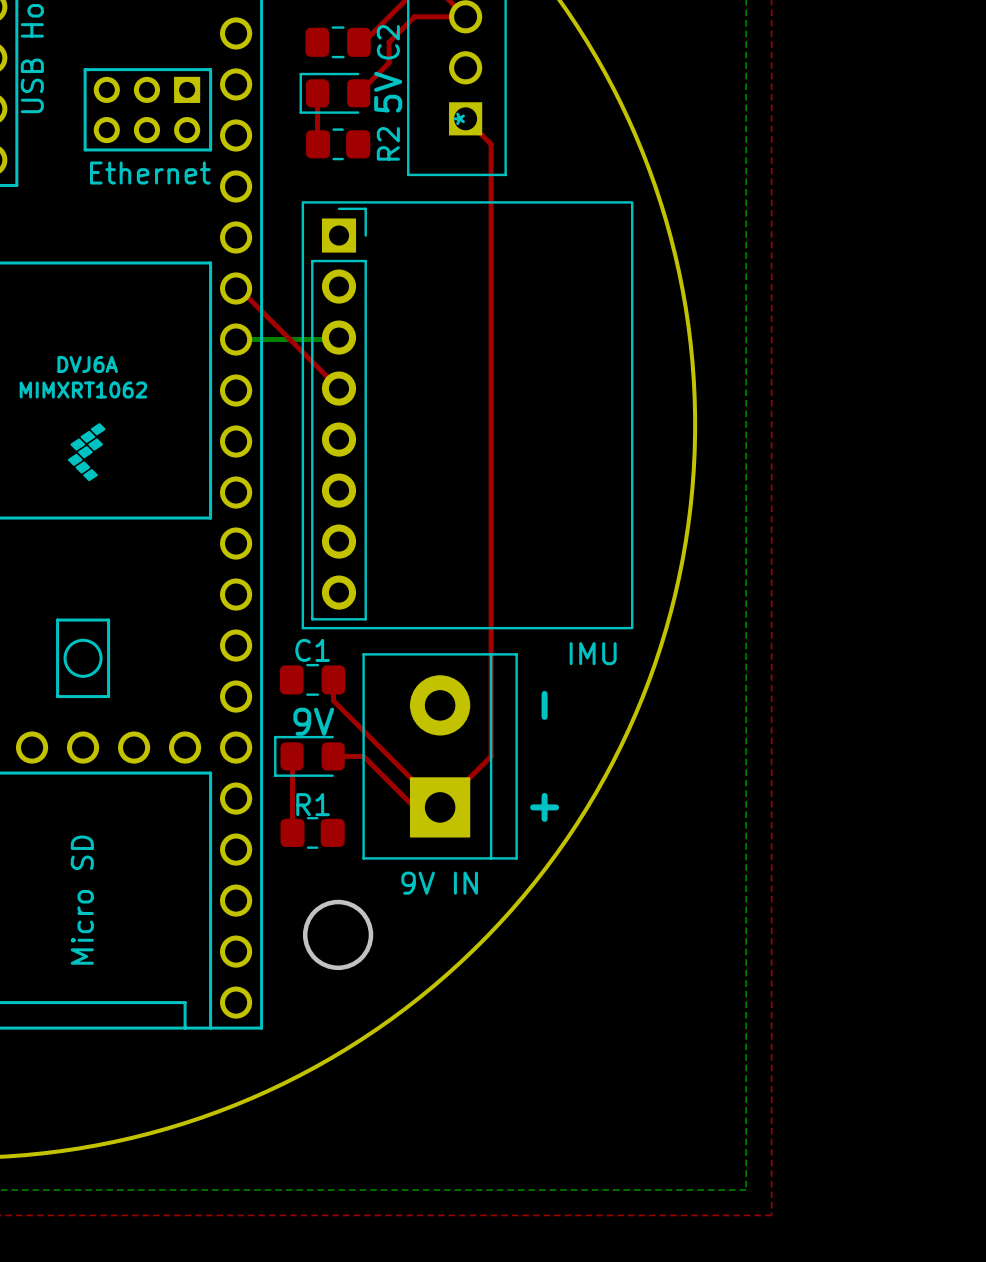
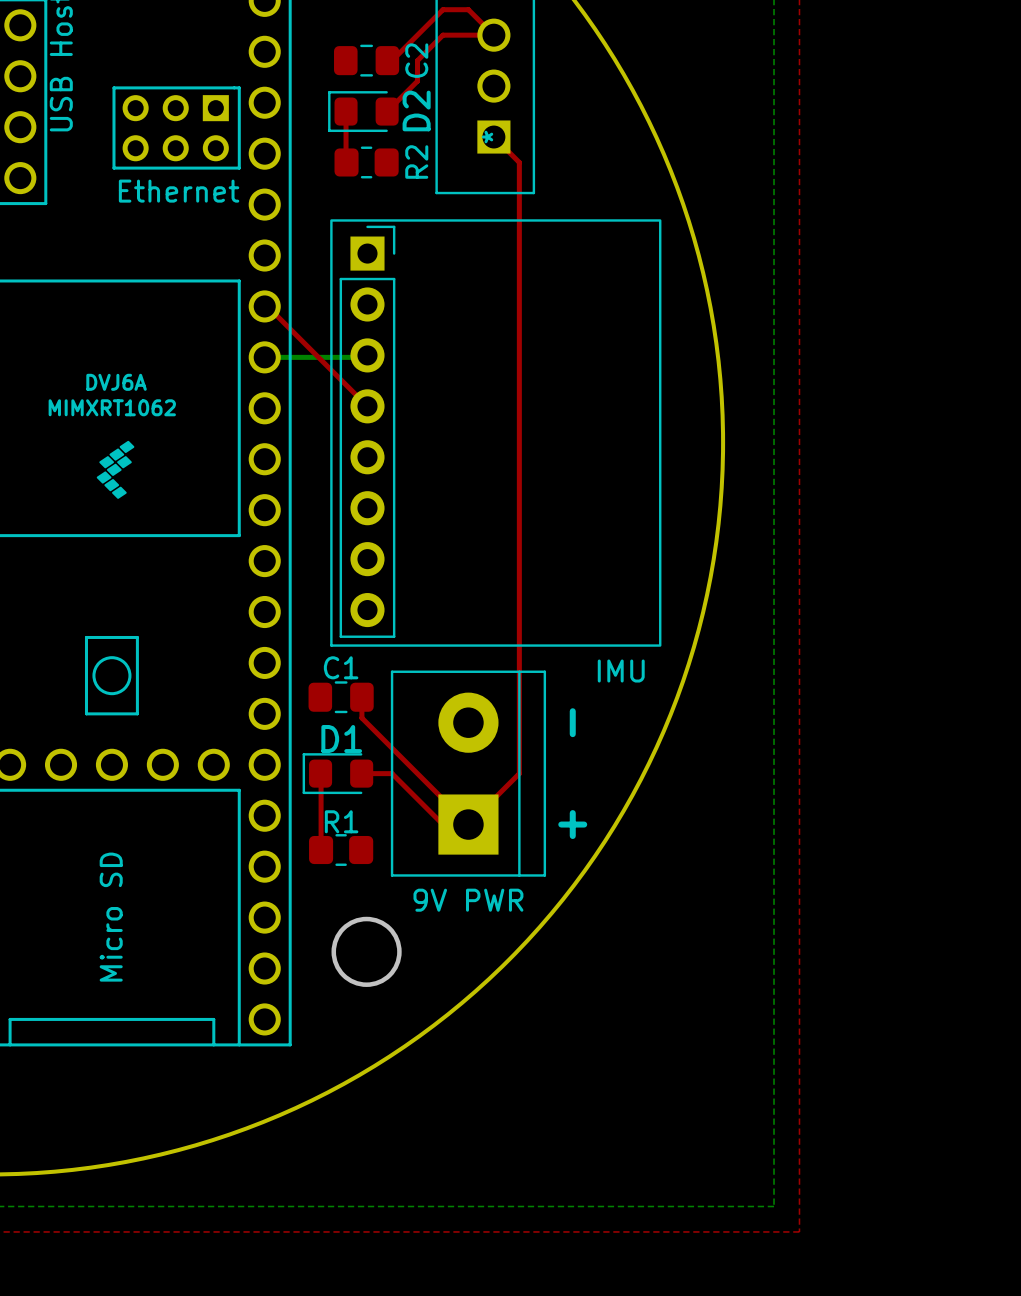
5V name: 5V (388, 92) -> D2 (416, 110)
9V name: 9V (313, 721) -> D1 (341, 739)
9V IN name: 9V IN (439, 883) -> 9V PWR (468, 900)

